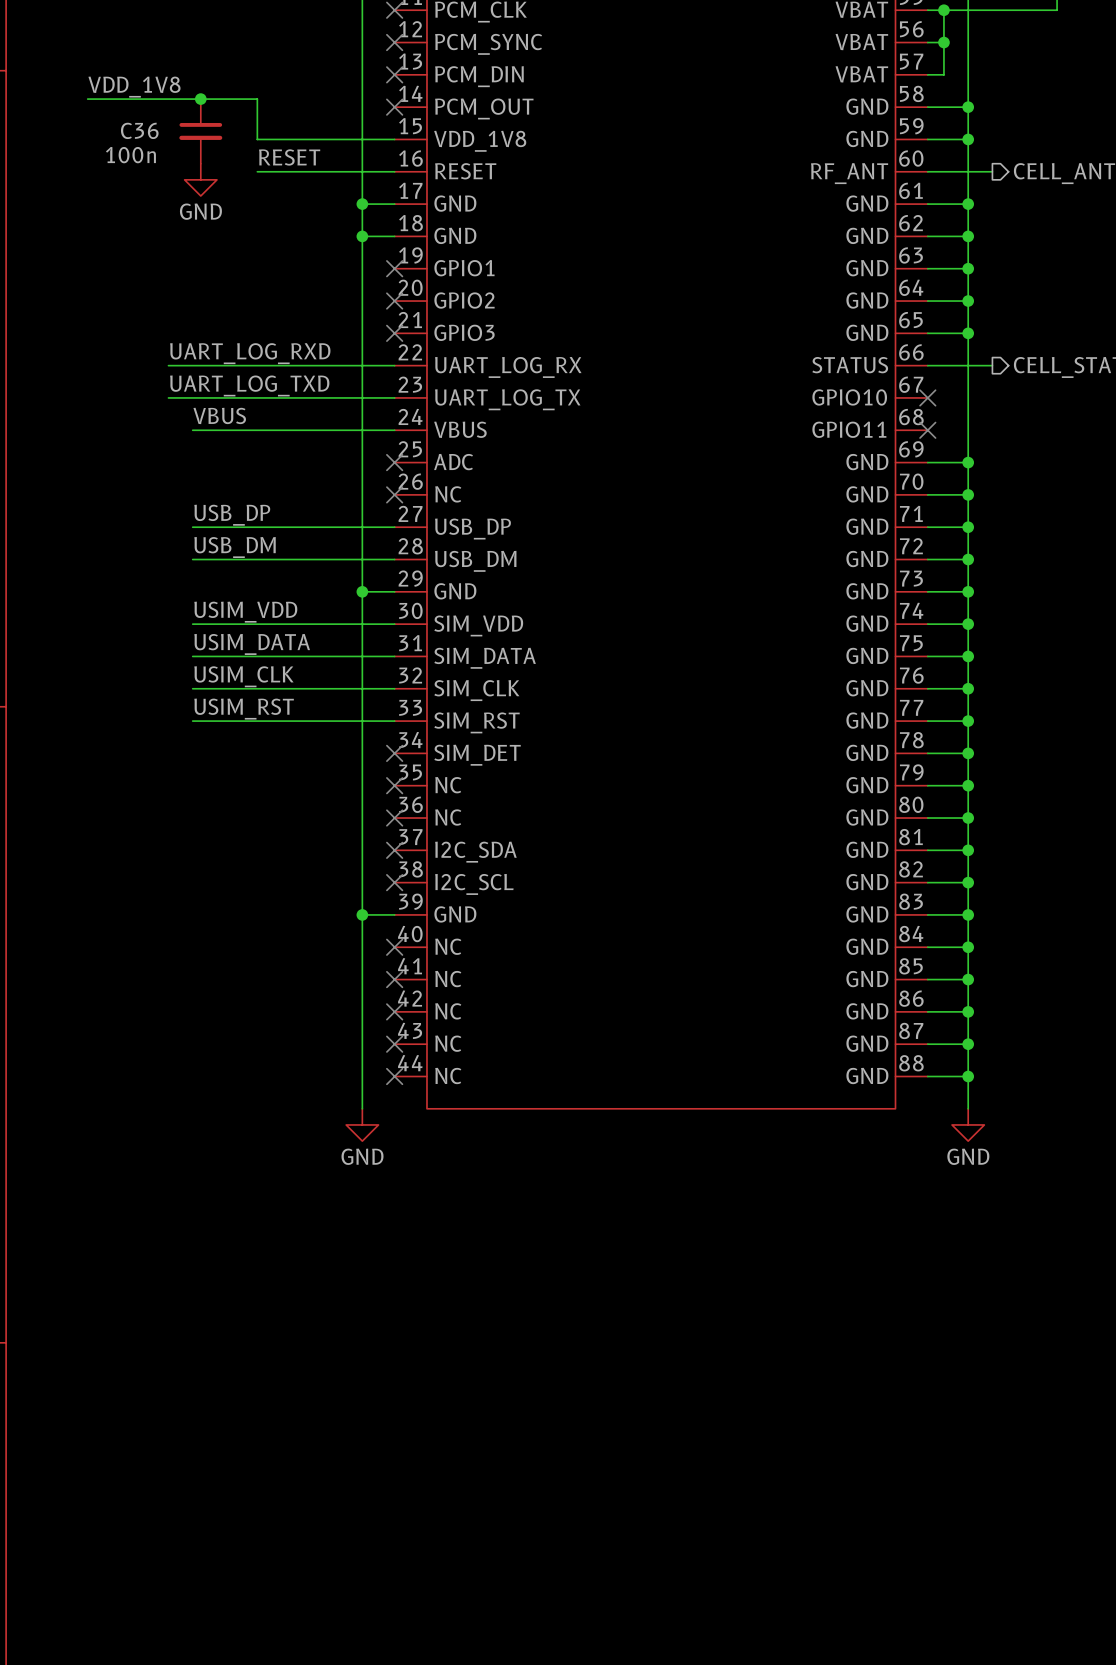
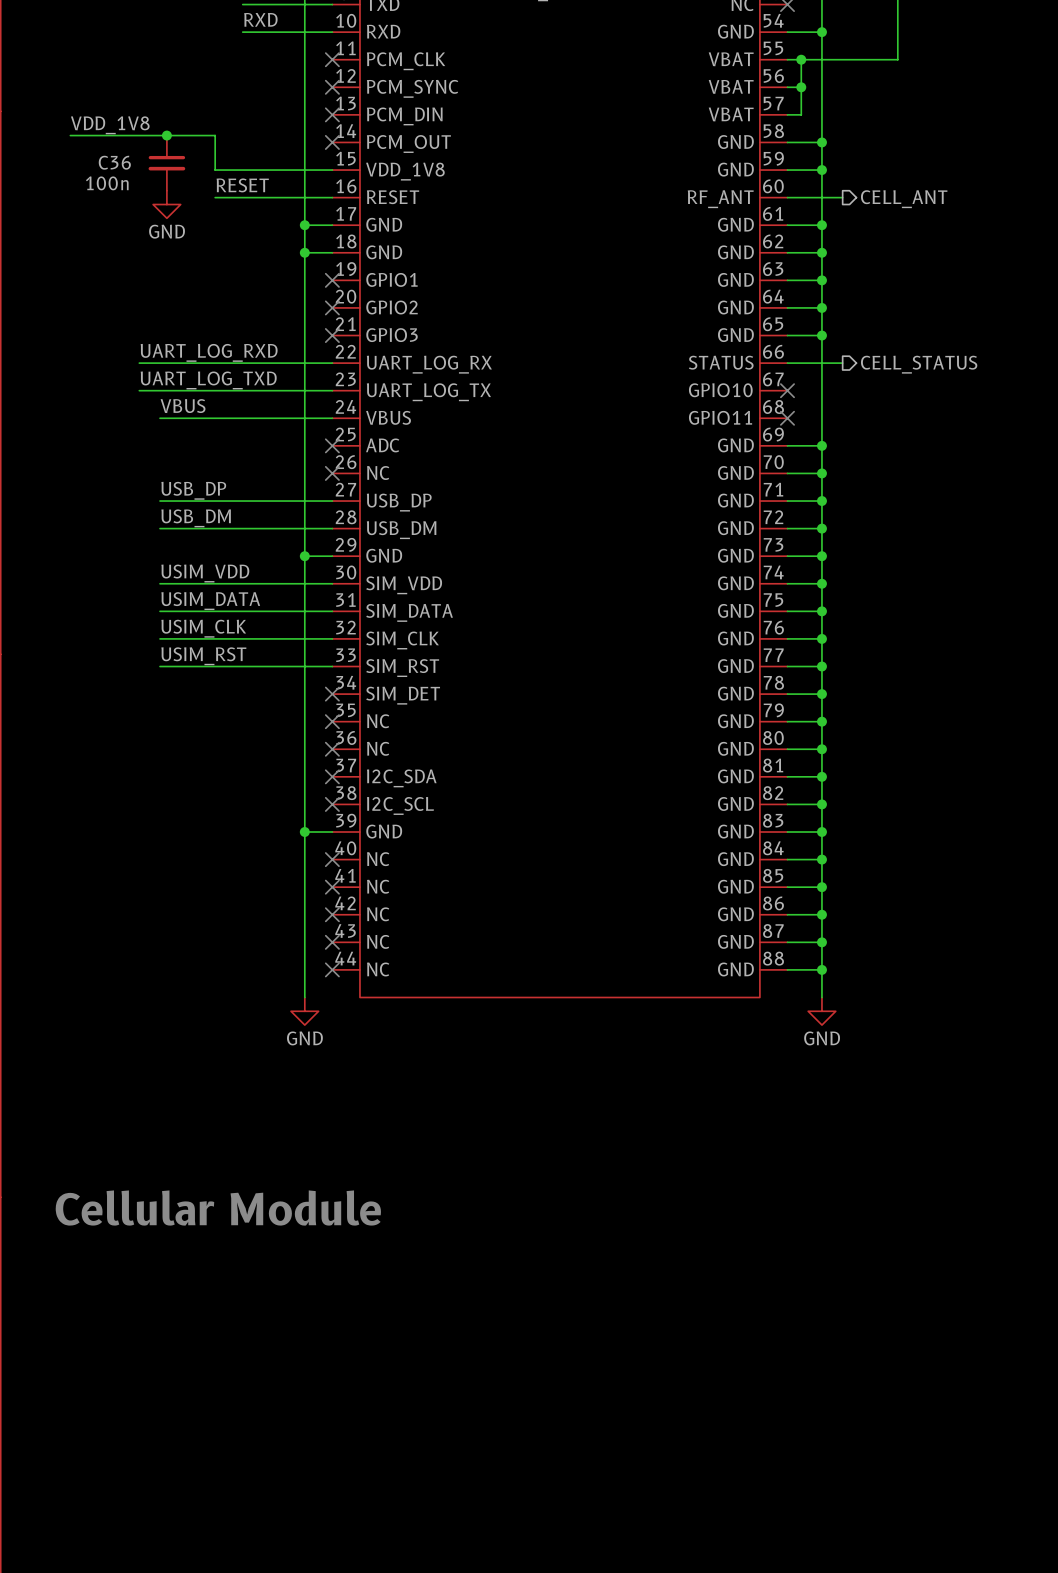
text: none -> Cellular Module (218, 1208)

